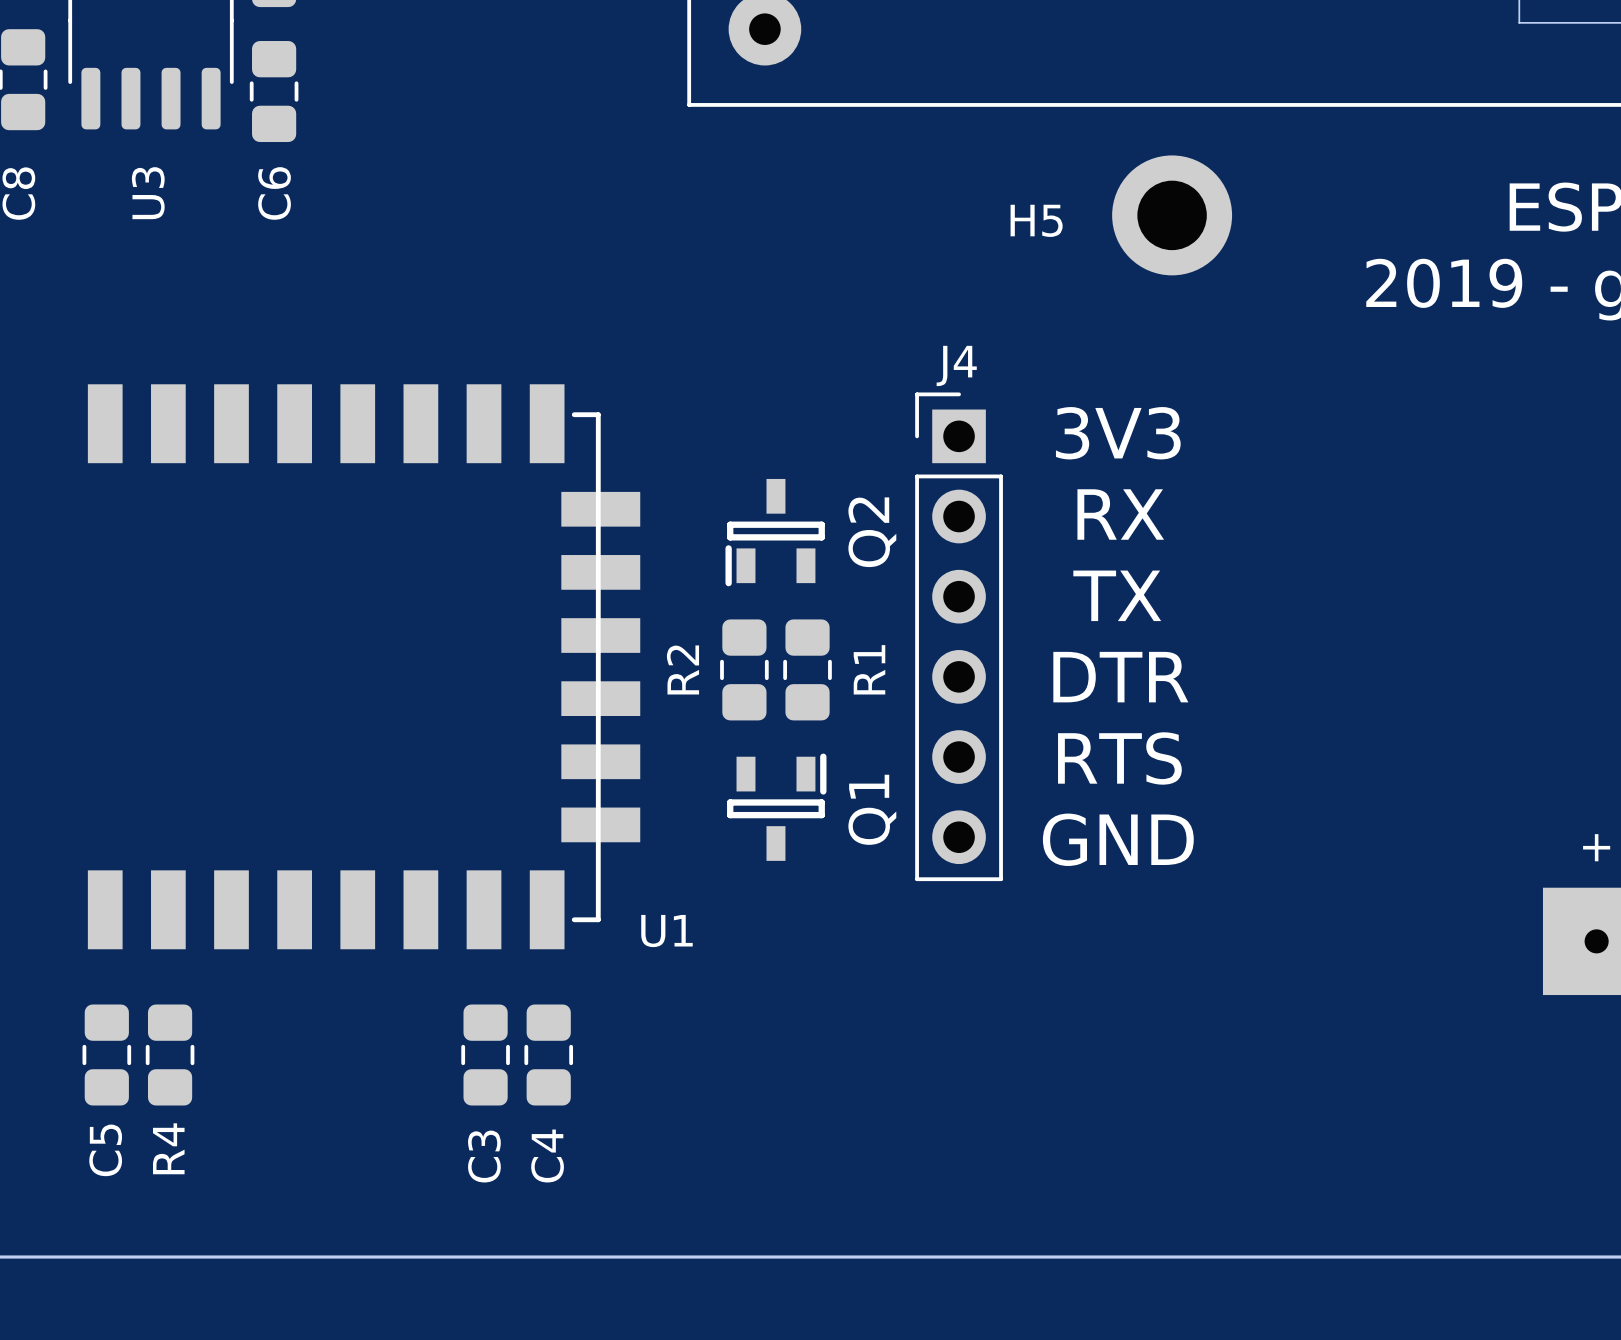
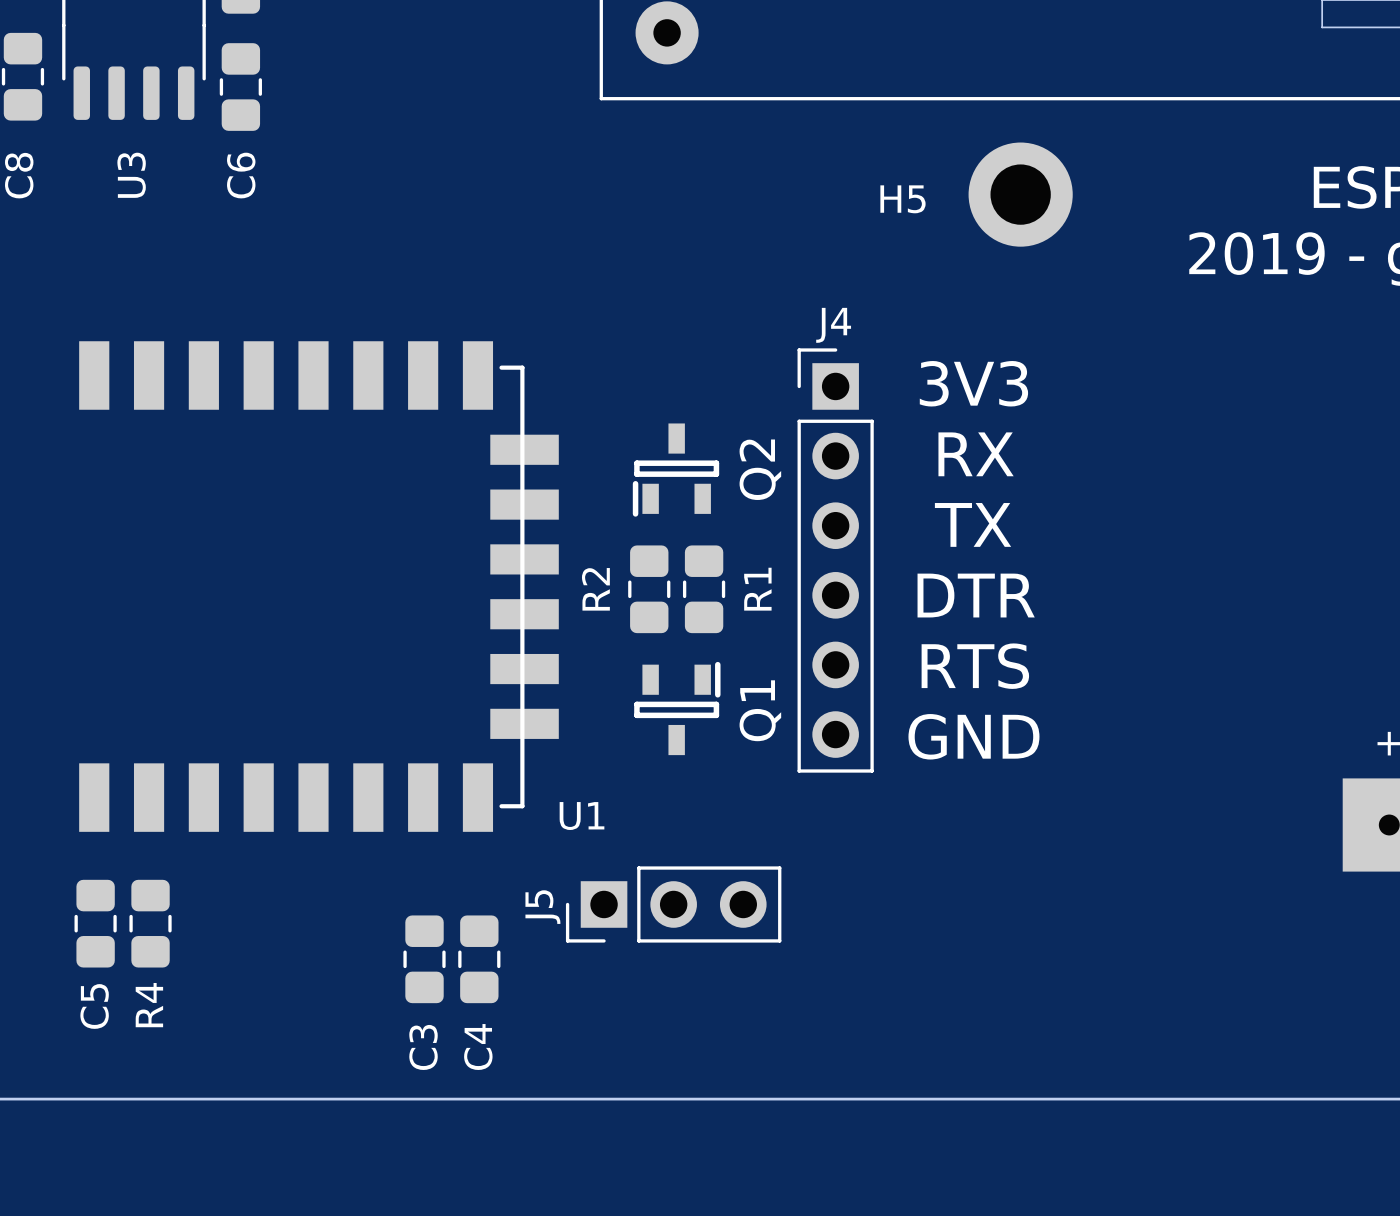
J5: none -> (673, 904)
C3 position: (485, 1055) -> (424, 959)
C4 position: (548, 1055) -> (479, 959)

